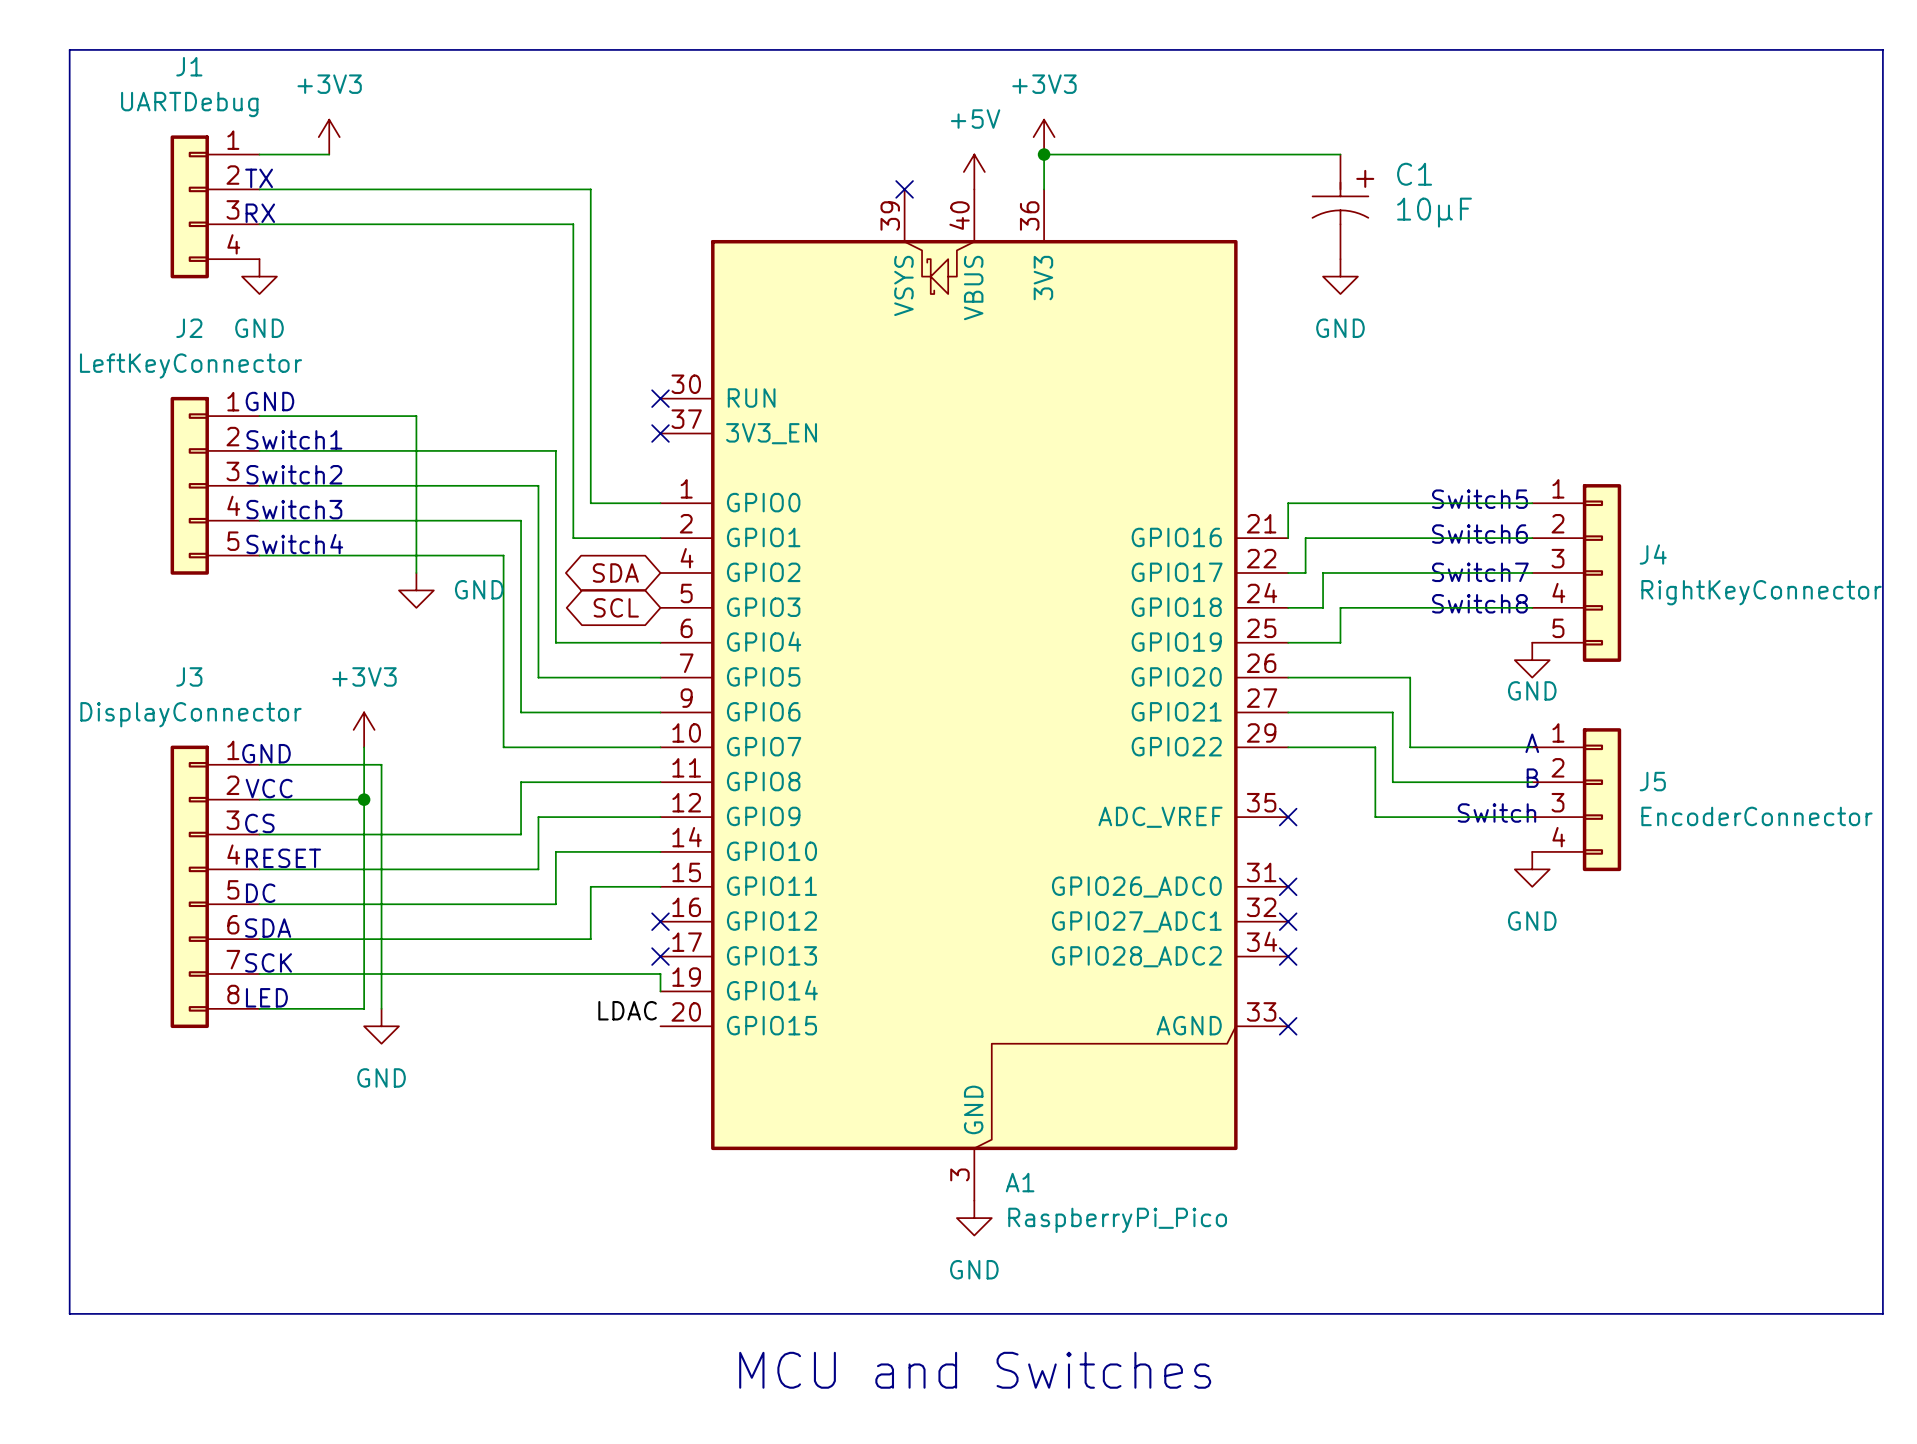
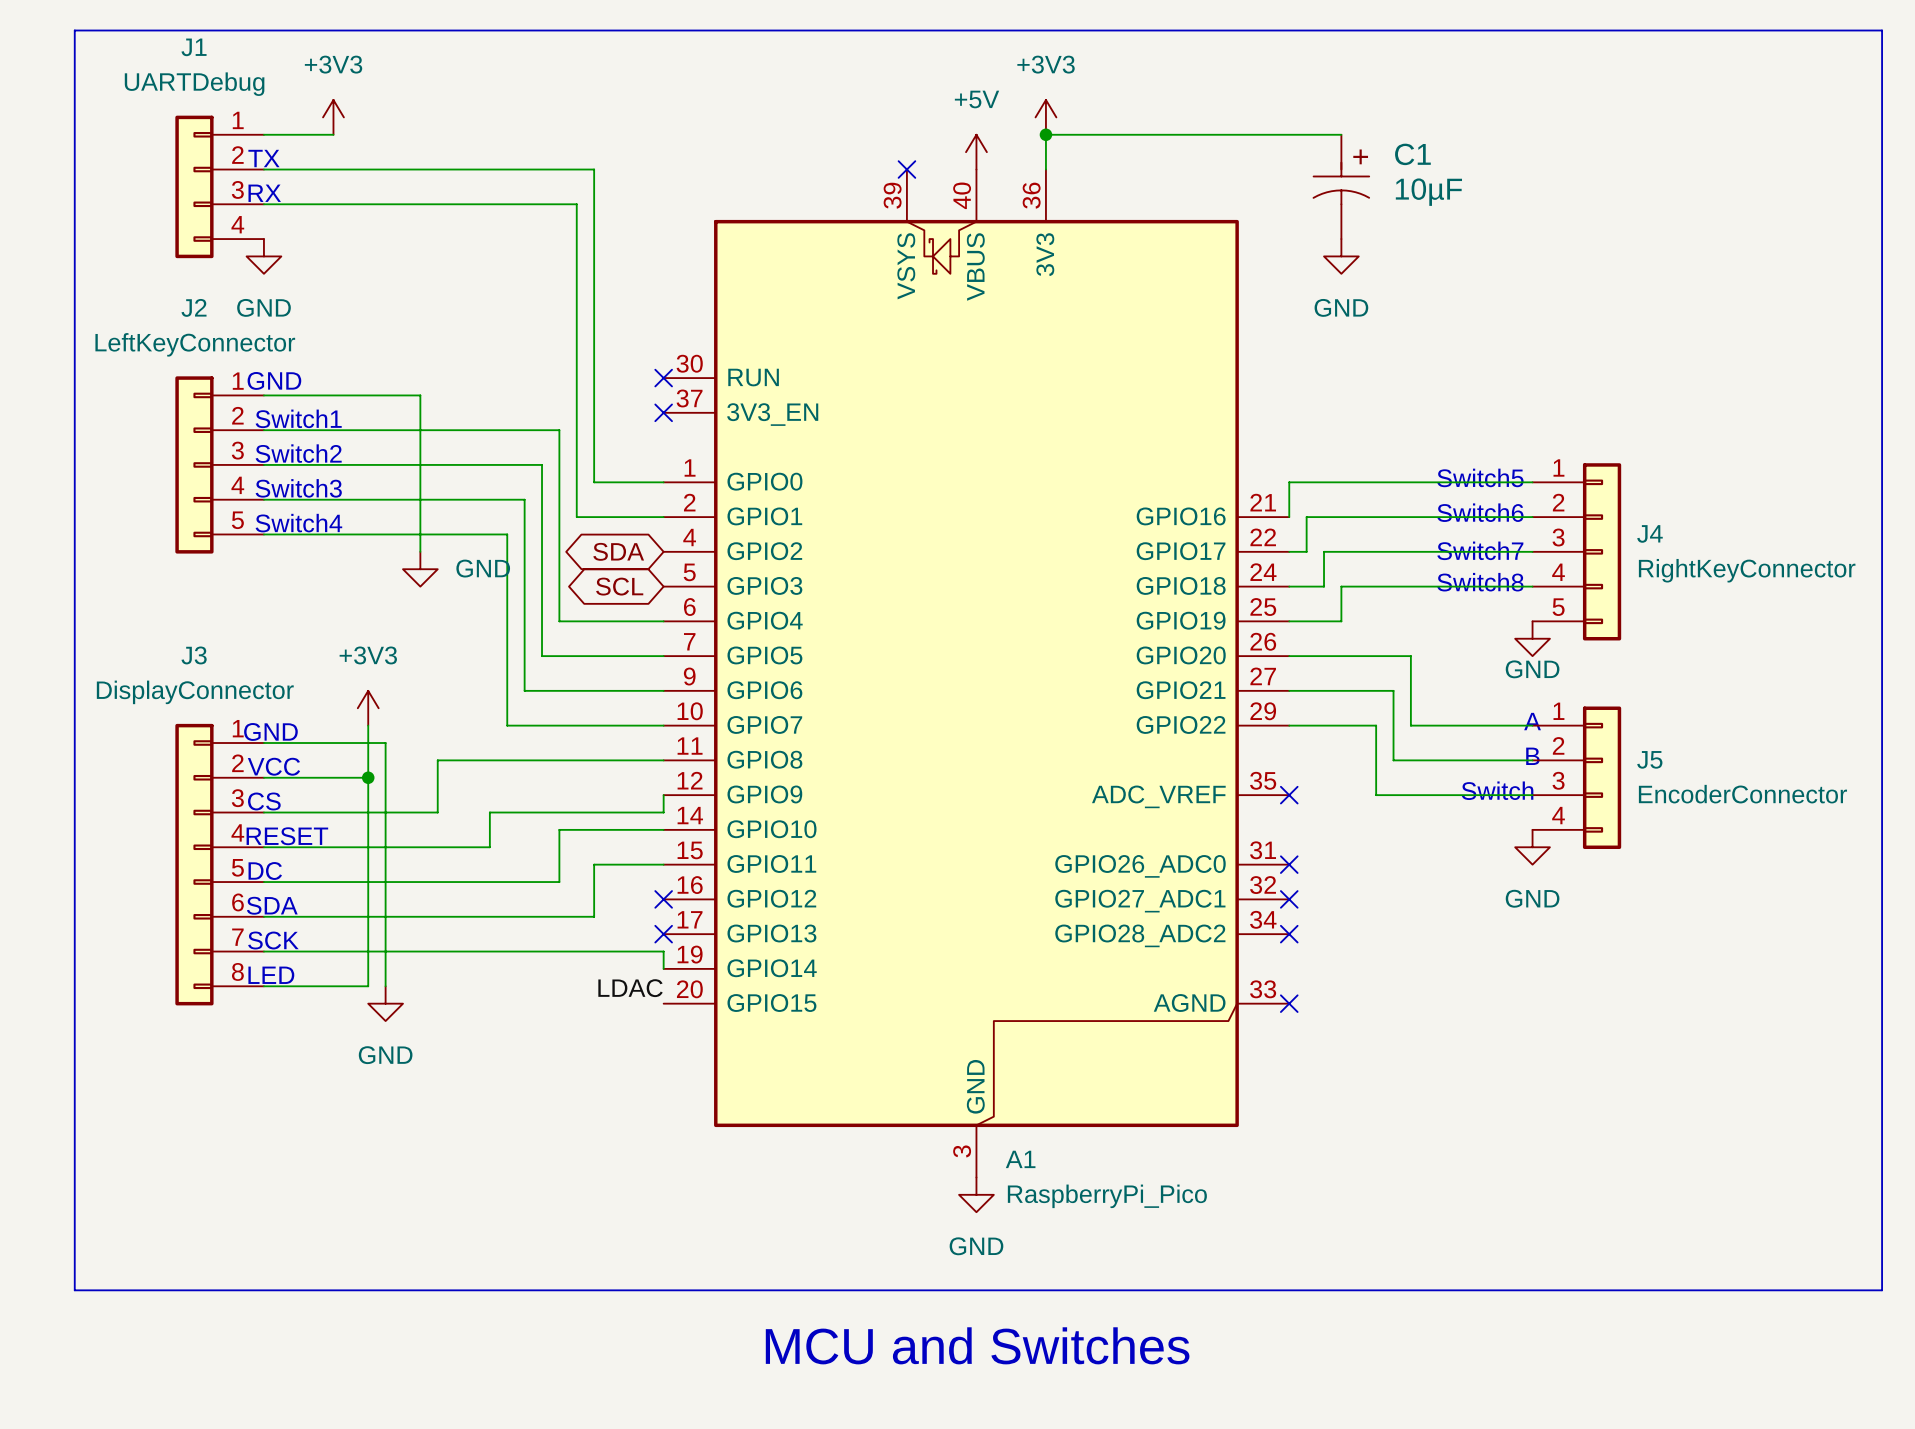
wire: (521, 782) (521, 834) -> none
wire: (660, 817) (538, 817) (538, 869) (486, 869) -> (663, 795) (663, 812) (524, 812)
wire: (433, 834) (486, 834) -> (437, 812) (437, 760) (524, 760)
wire: none -> (489, 812) (489, 847)

